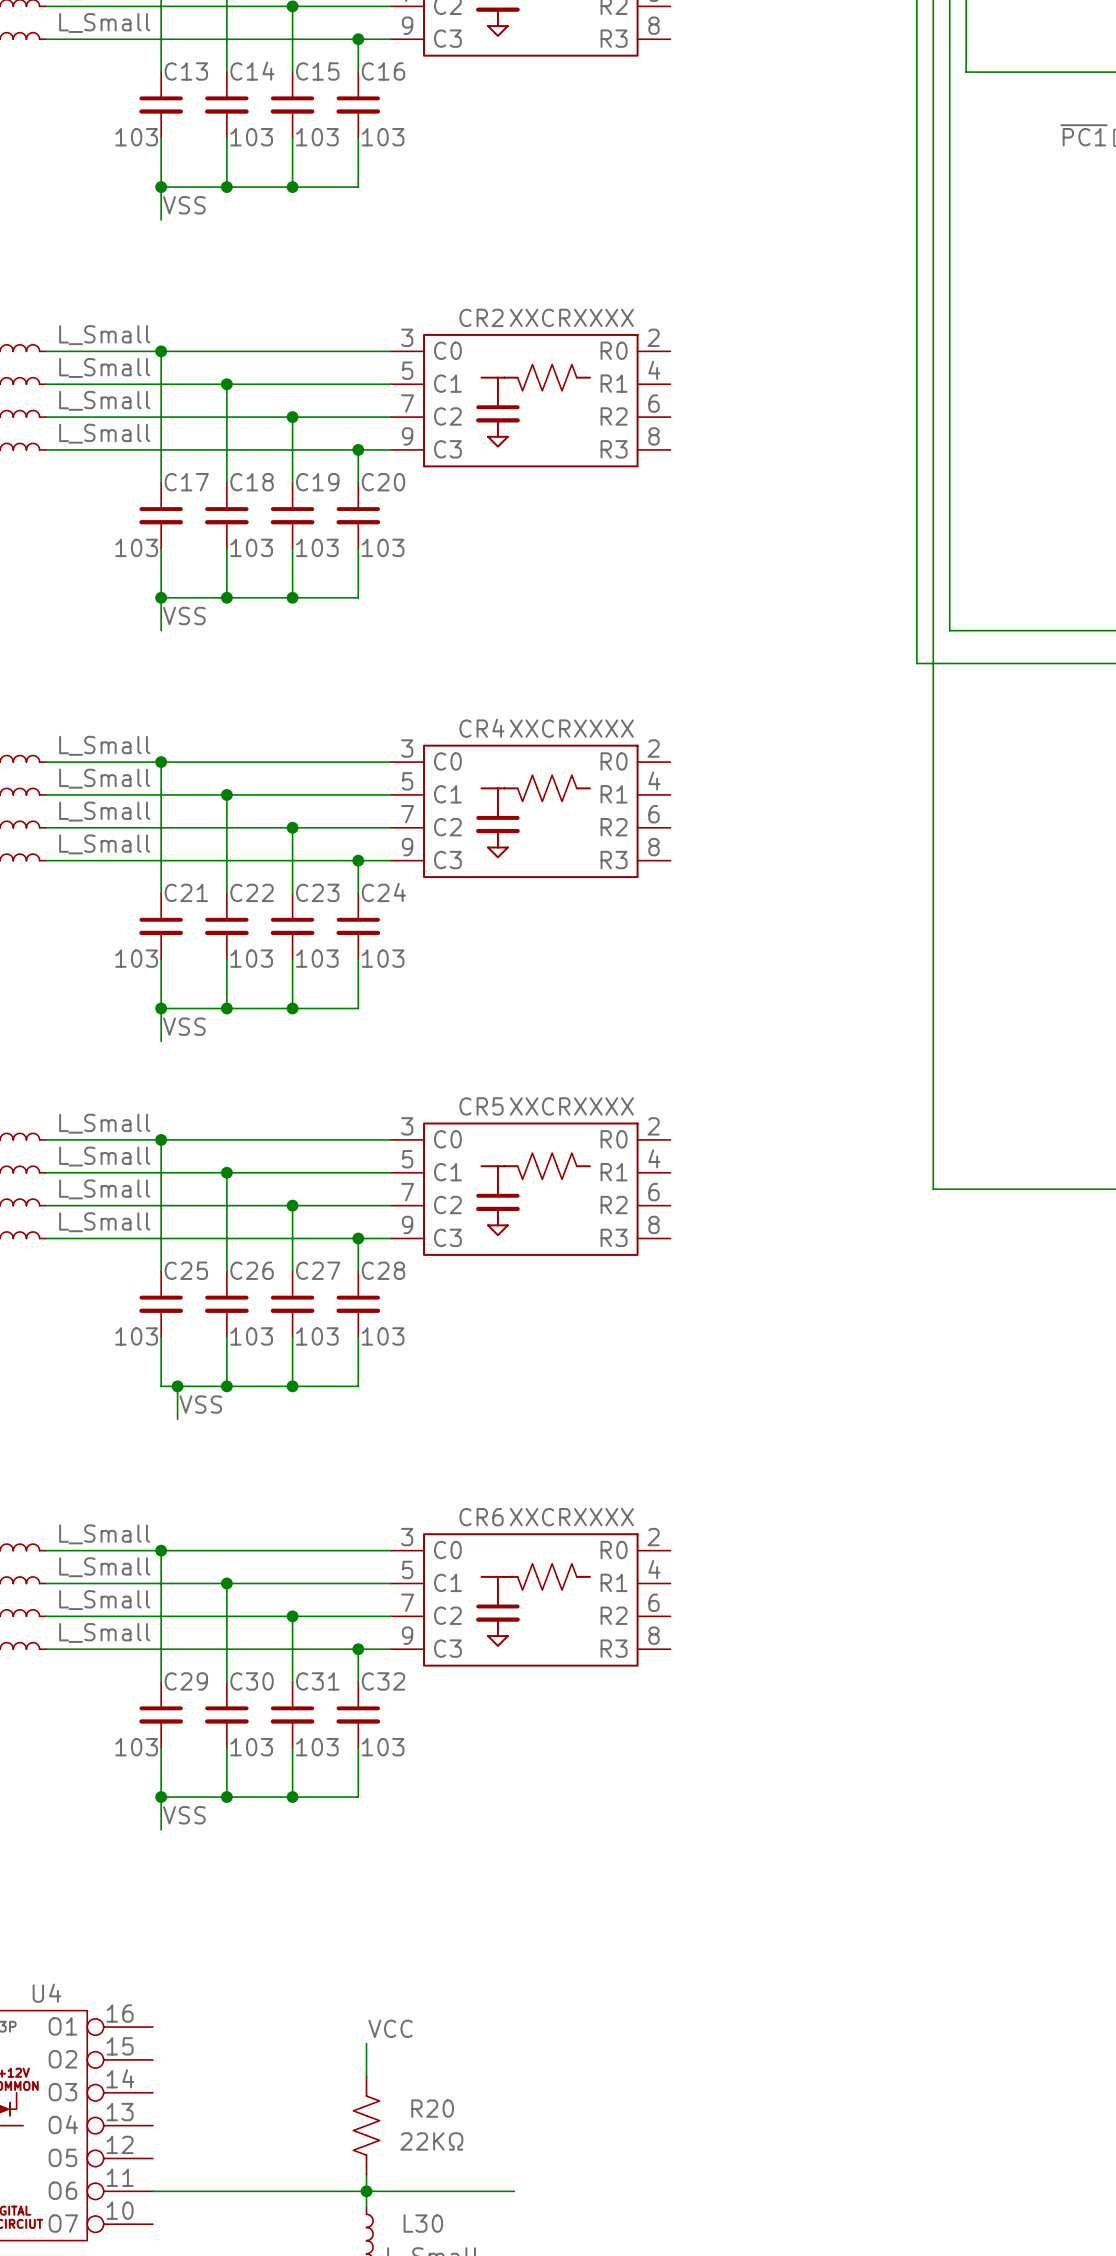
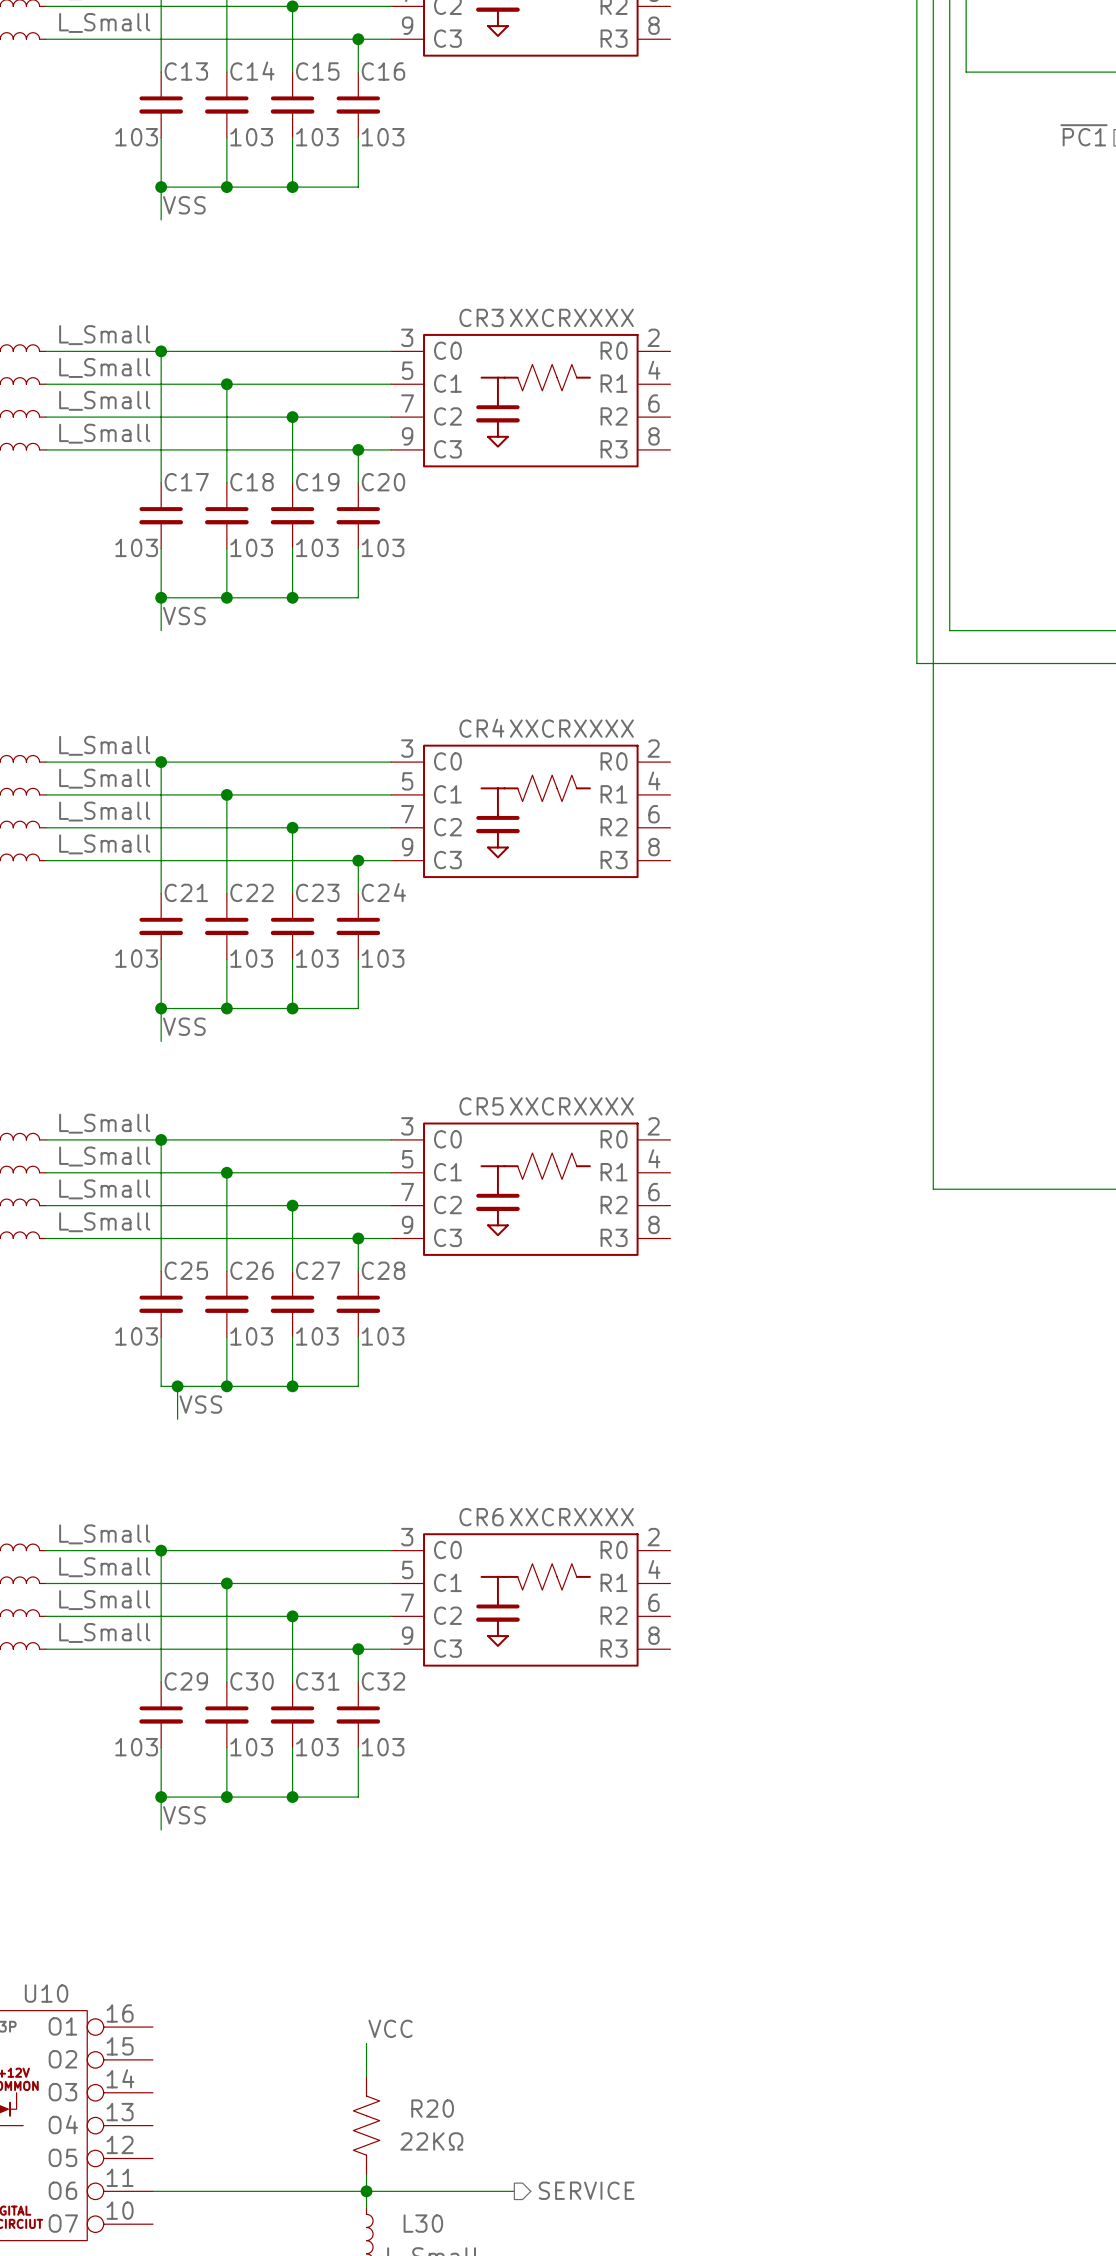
CR2 name: CR2 (481, 317) -> CR3 (481, 317)
U4 name: U4 (46, 1993) -> U10 (46, 1993)
hierarchical label: none -> SERVICE (586, 2190)

